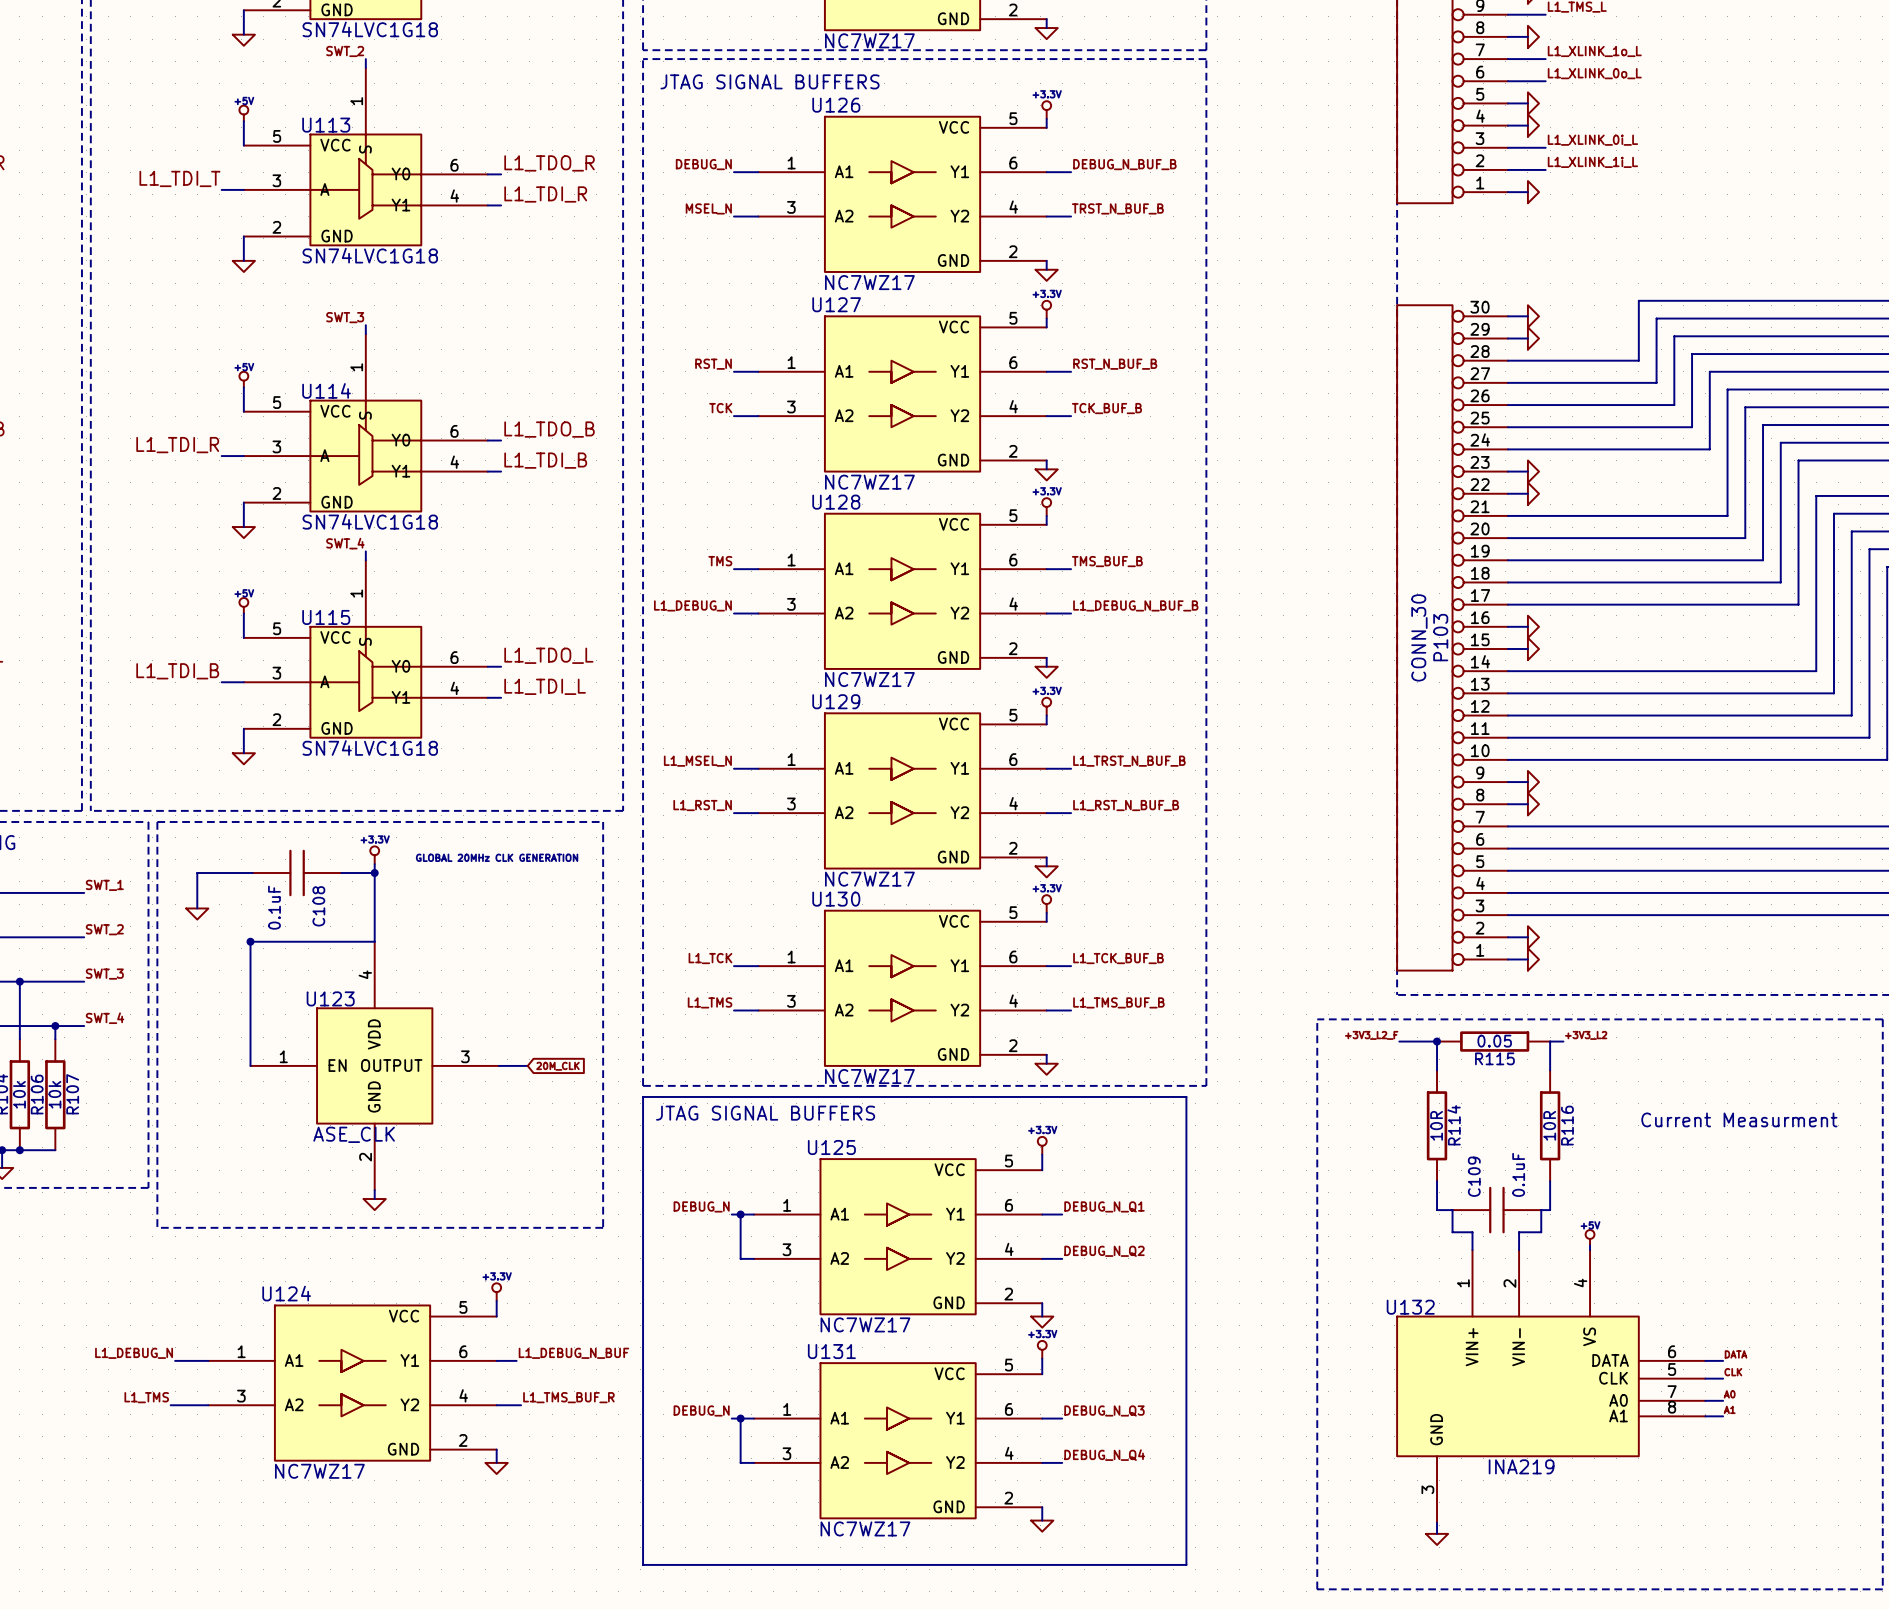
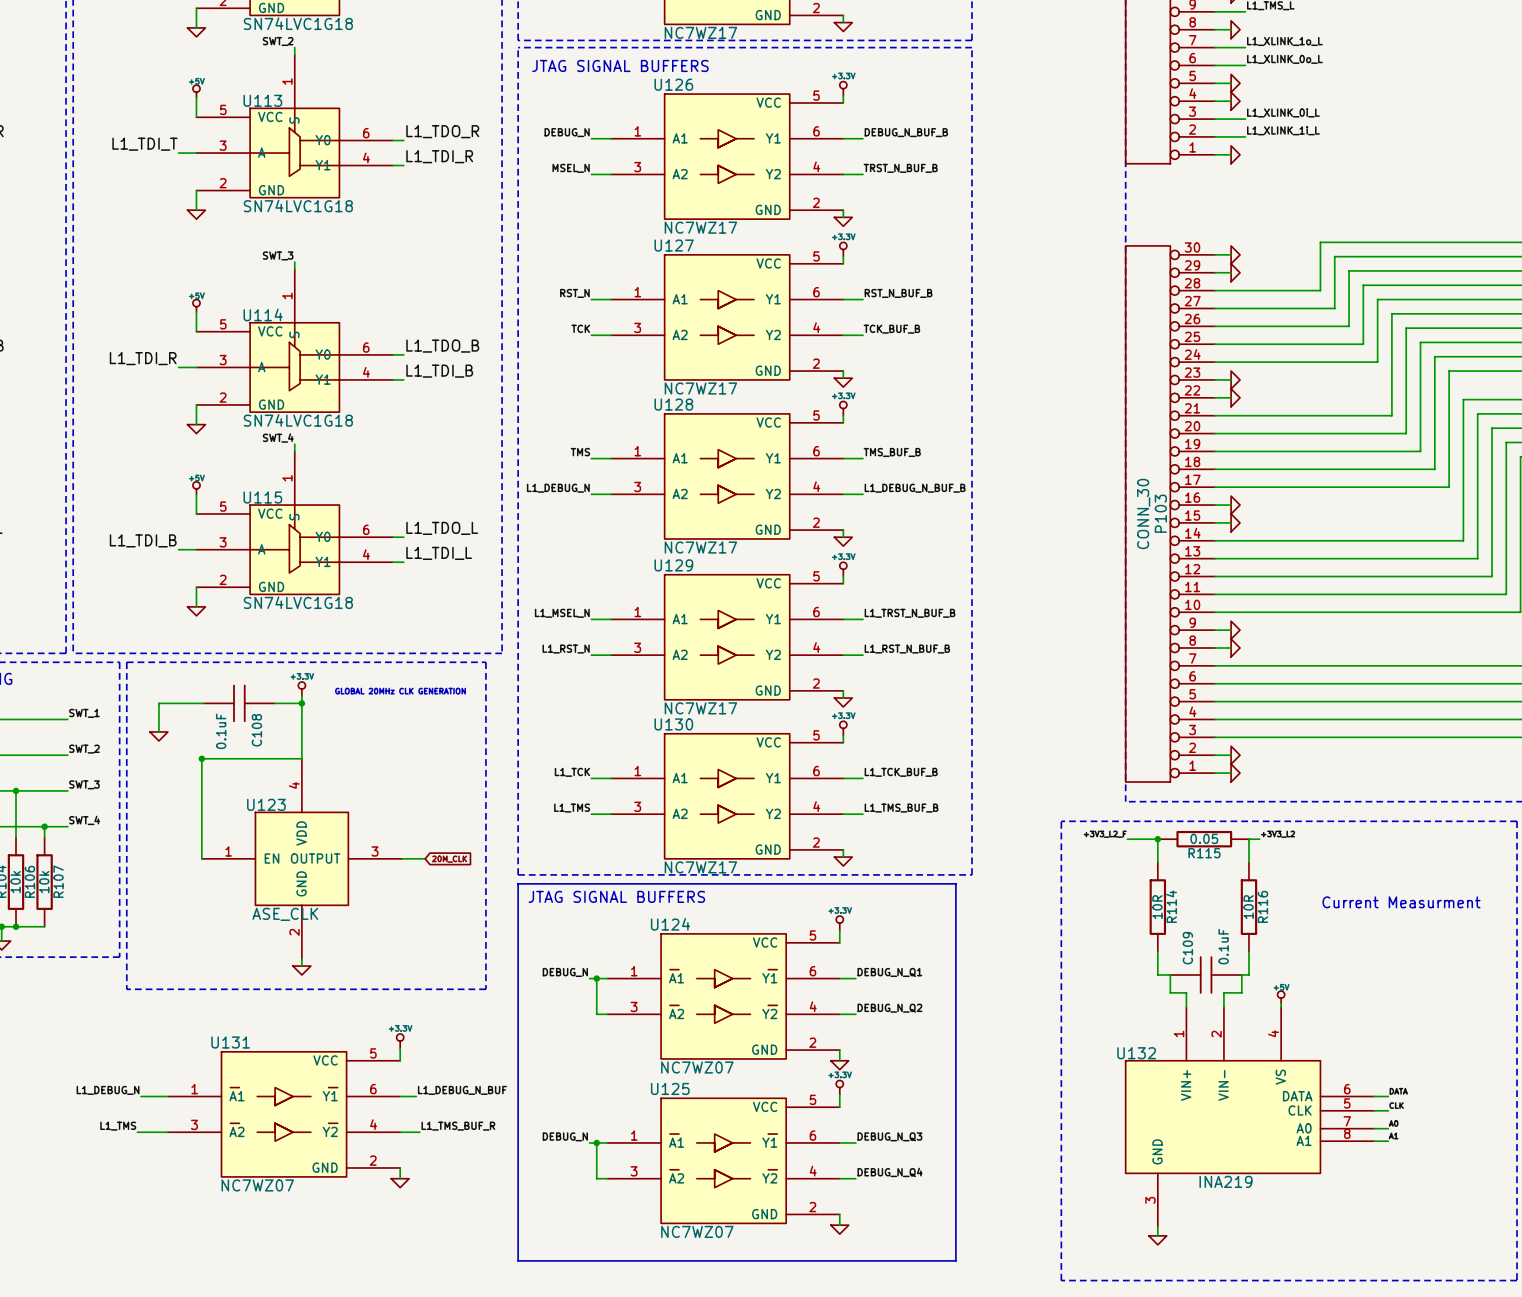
U125 symbol: [753, 1159, 1043, 1315] -> [607, 1098, 840, 1224]
U124 symbol: [208, 1305, 497, 1461] -> [607, 933, 840, 1059]
U125 value: NC7WZ17 (865, 1324) -> NC7WZ07 (697, 1231)
U131 symbol: [753, 1363, 1043, 1519] -> [167, 1051, 401, 1177]
U124 value: NC7WZ17 (319, 1471) -> NC7WZ07 (697, 1067)
U131 value: NC7WZ17 (865, 1528) -> NC7WZ07 (257, 1185)

